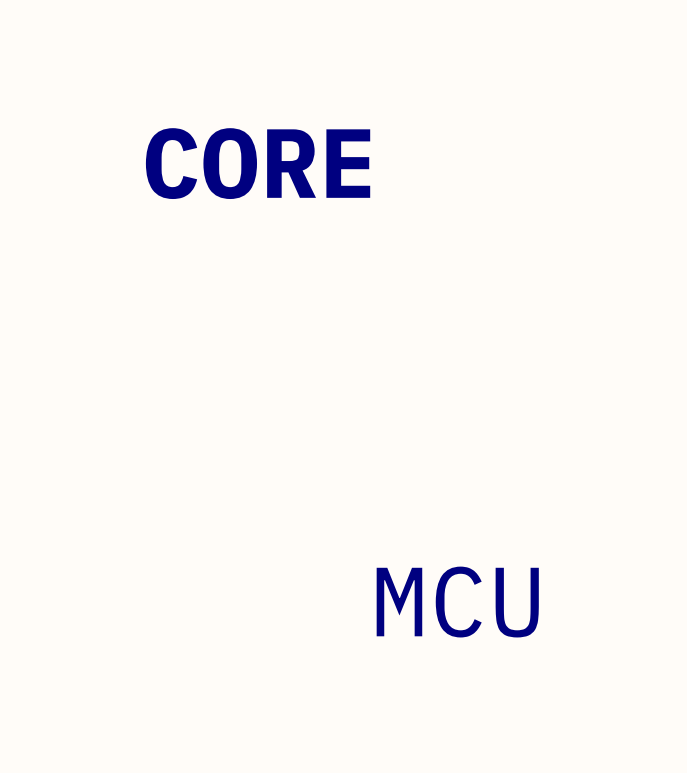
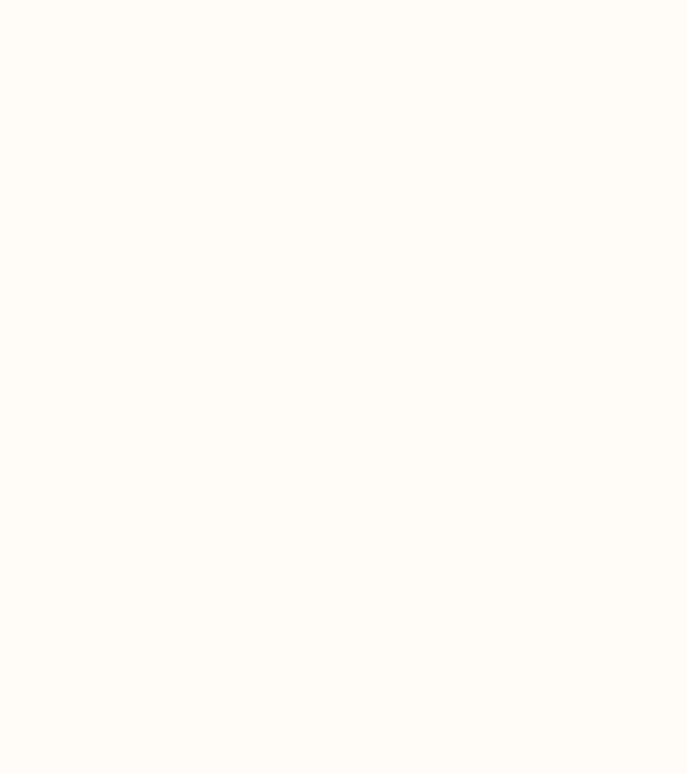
text: CORE (258, 163) -> none
text: MCU (457, 602) -> none

